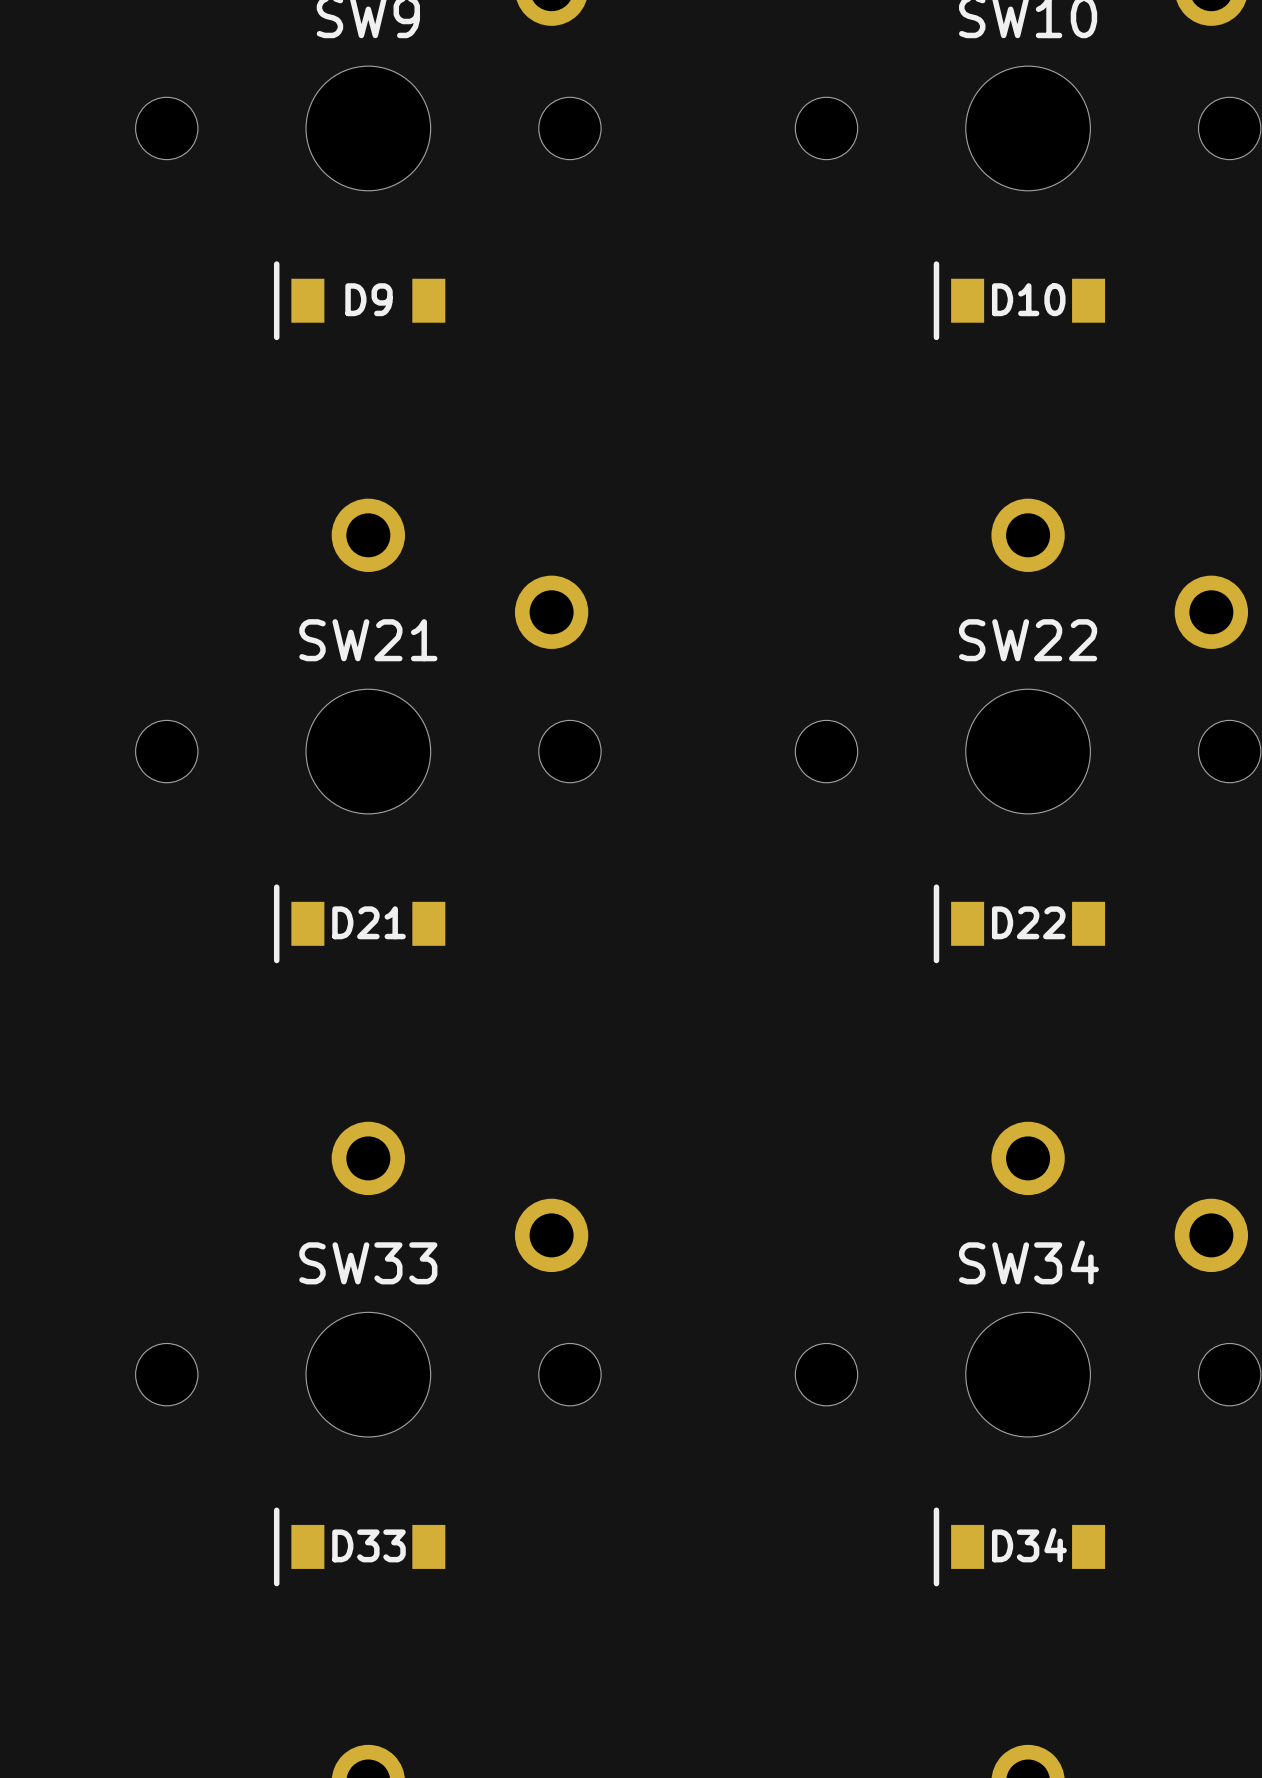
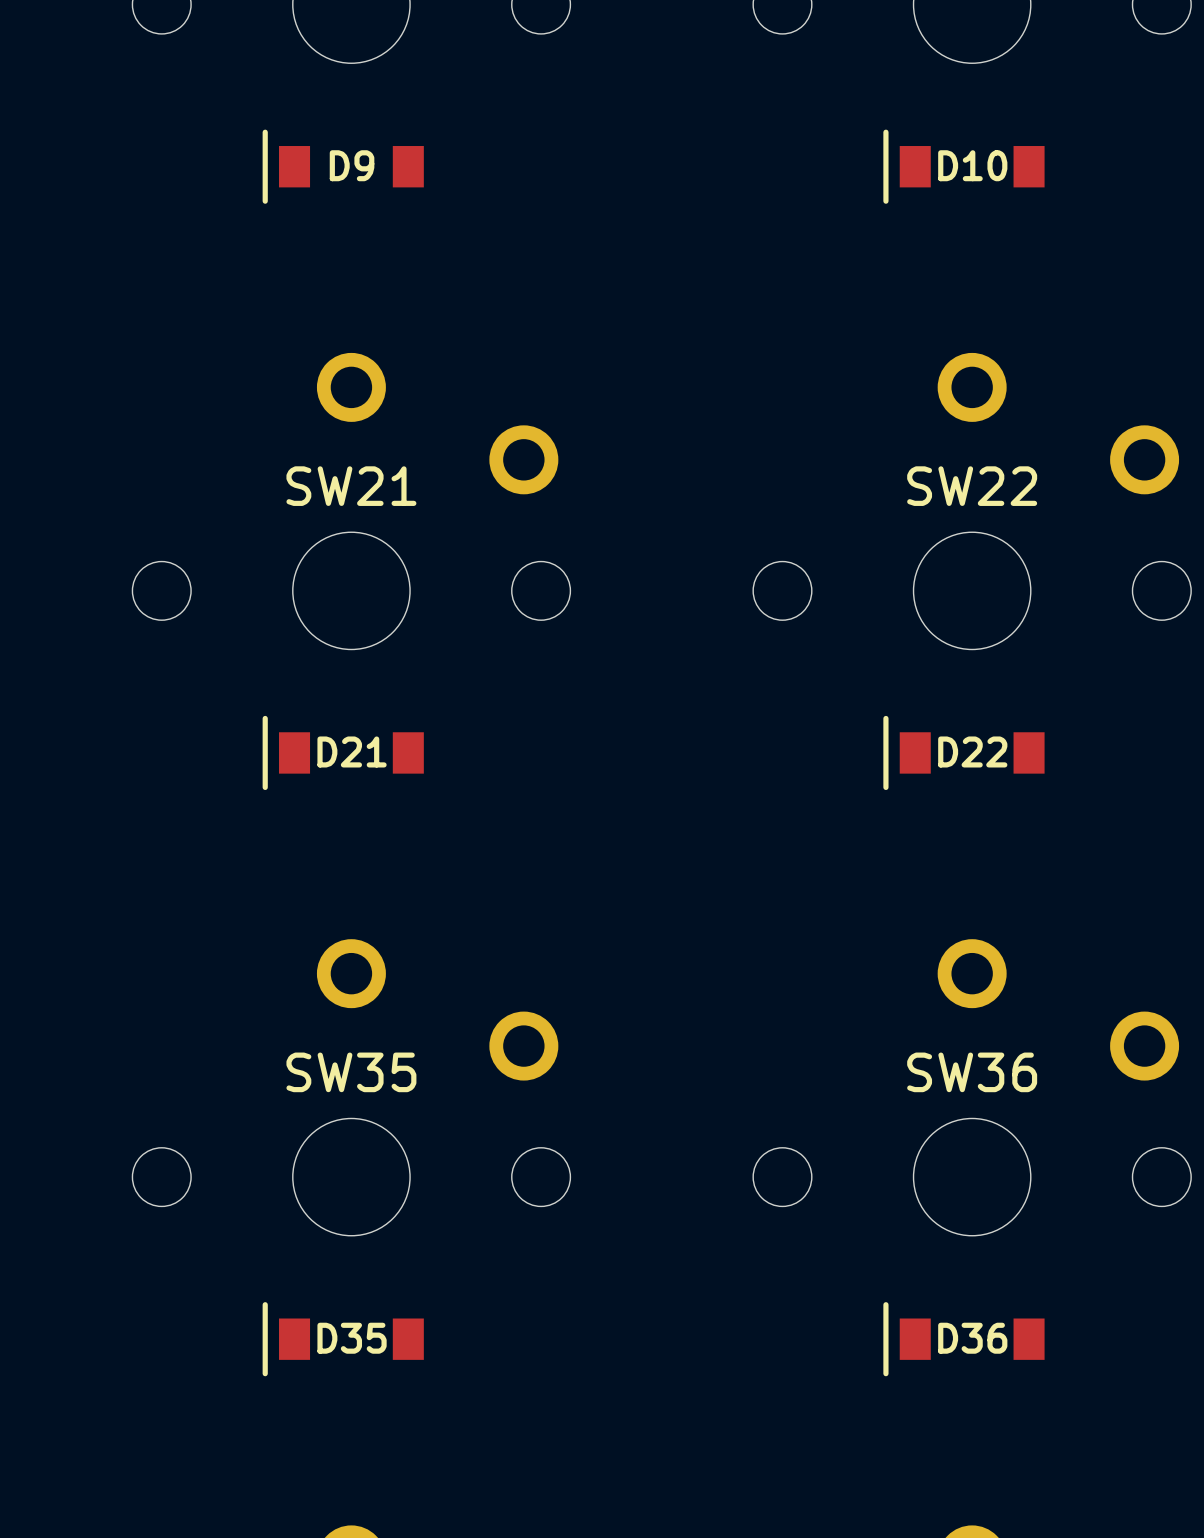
SW34 name: SW34 (1028, 1262) -> SW36 (972, 1072)
SW33 name: SW33 (368, 1263) -> SW35 (351, 1072)
D33 name: D33 (369, 1545) -> D35 (352, 1338)
D34 name: D34 (1029, 1545) -> D36 (972, 1338)

